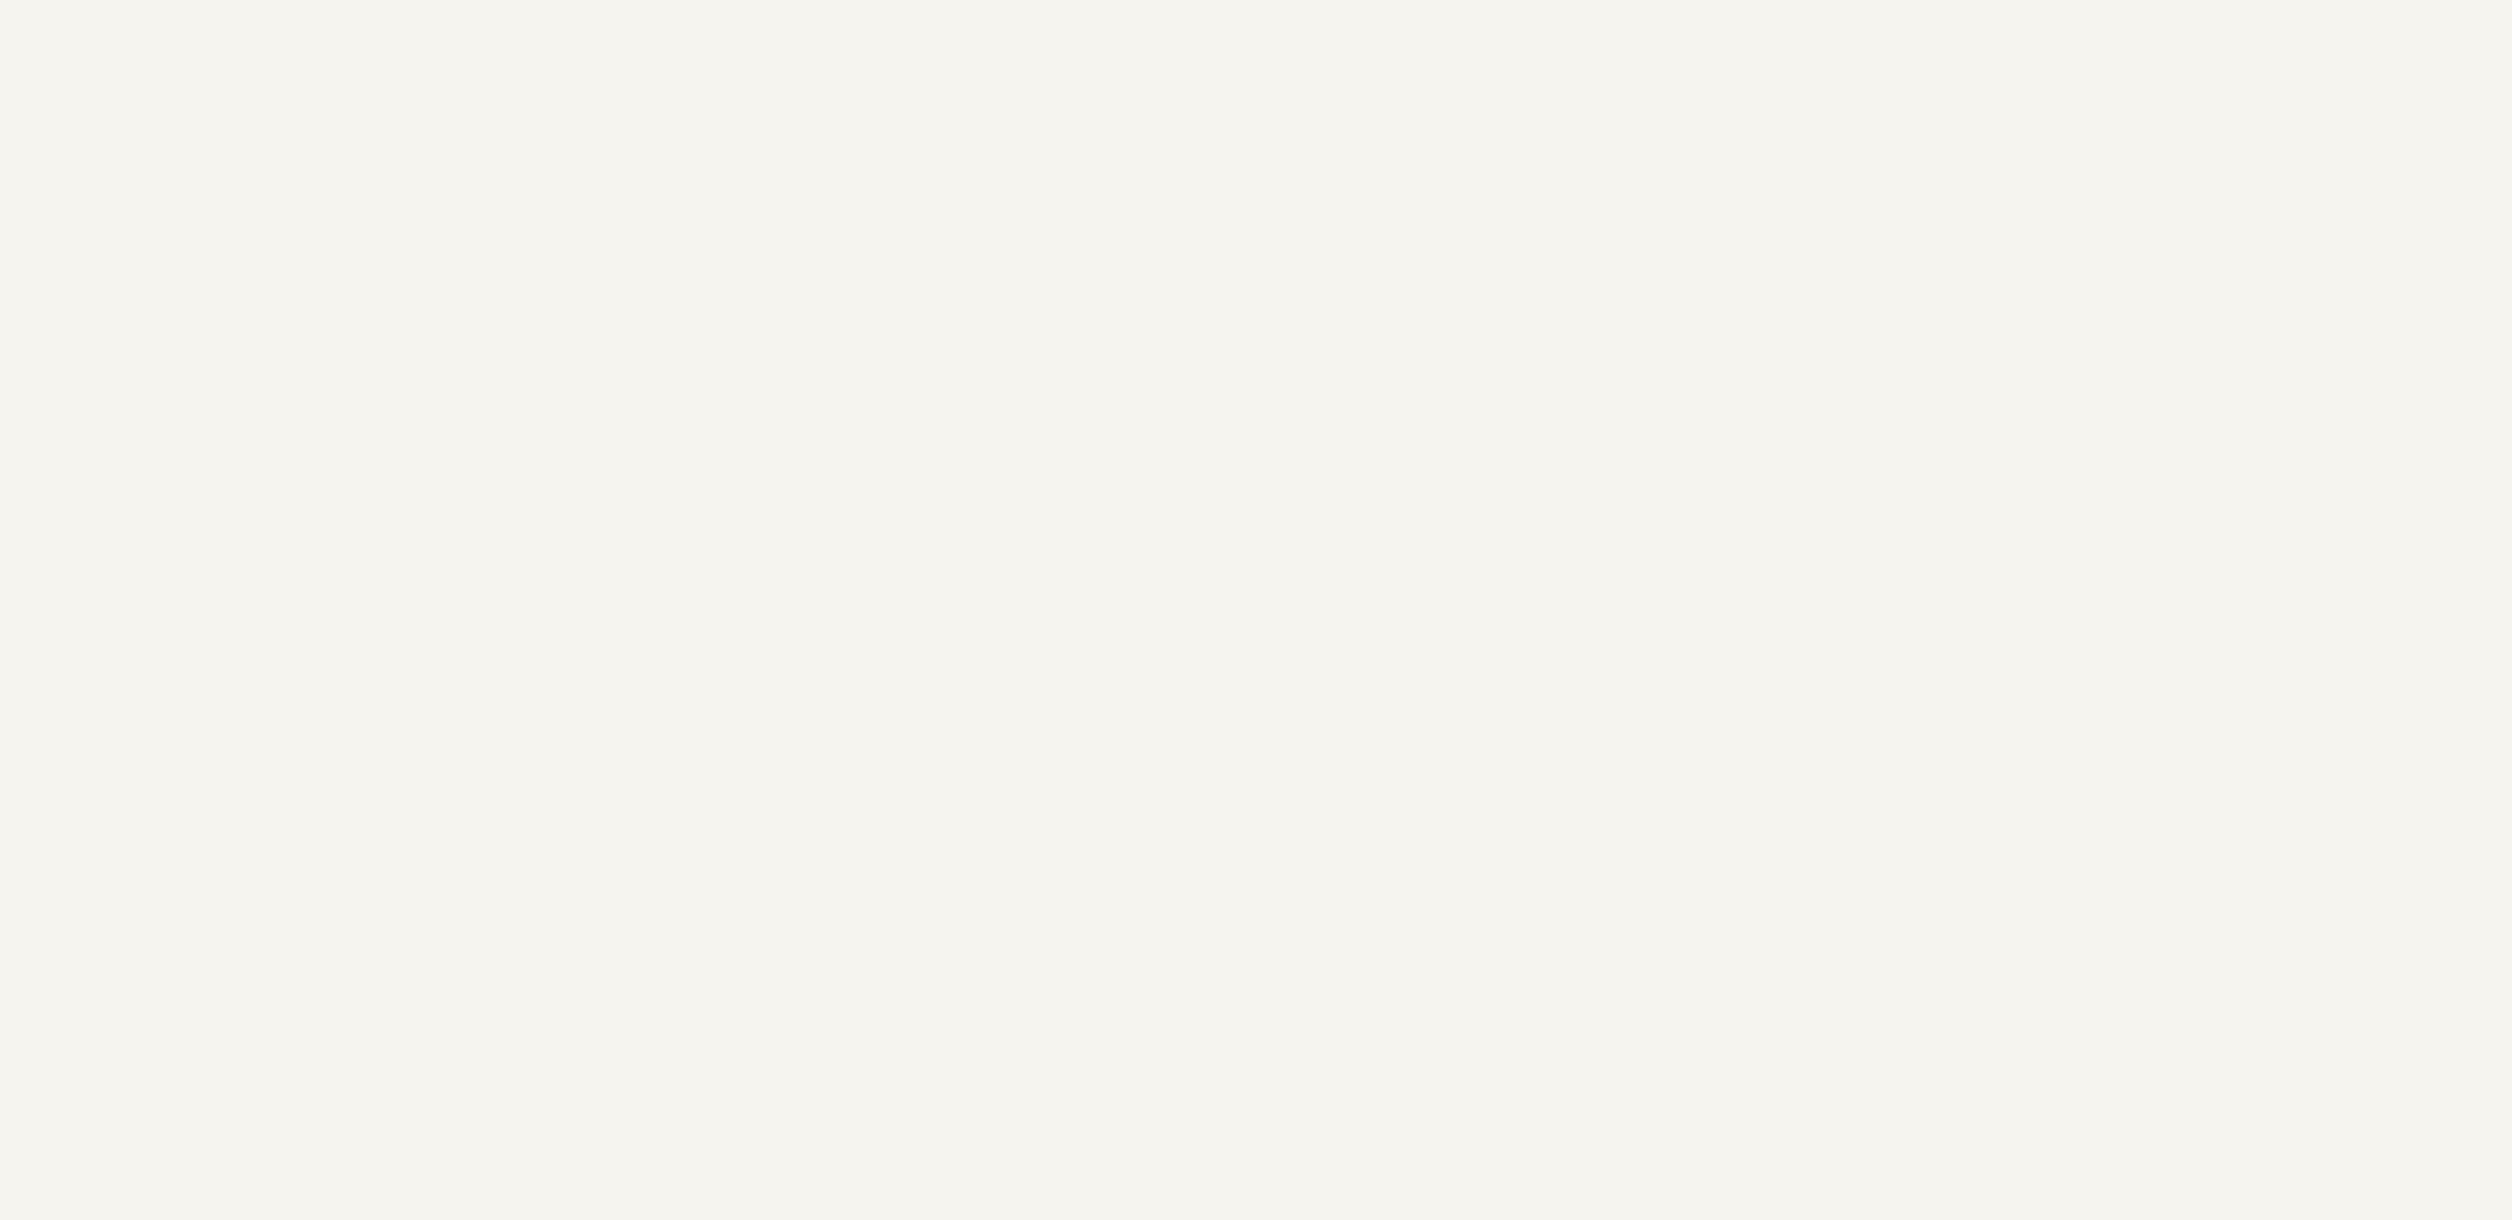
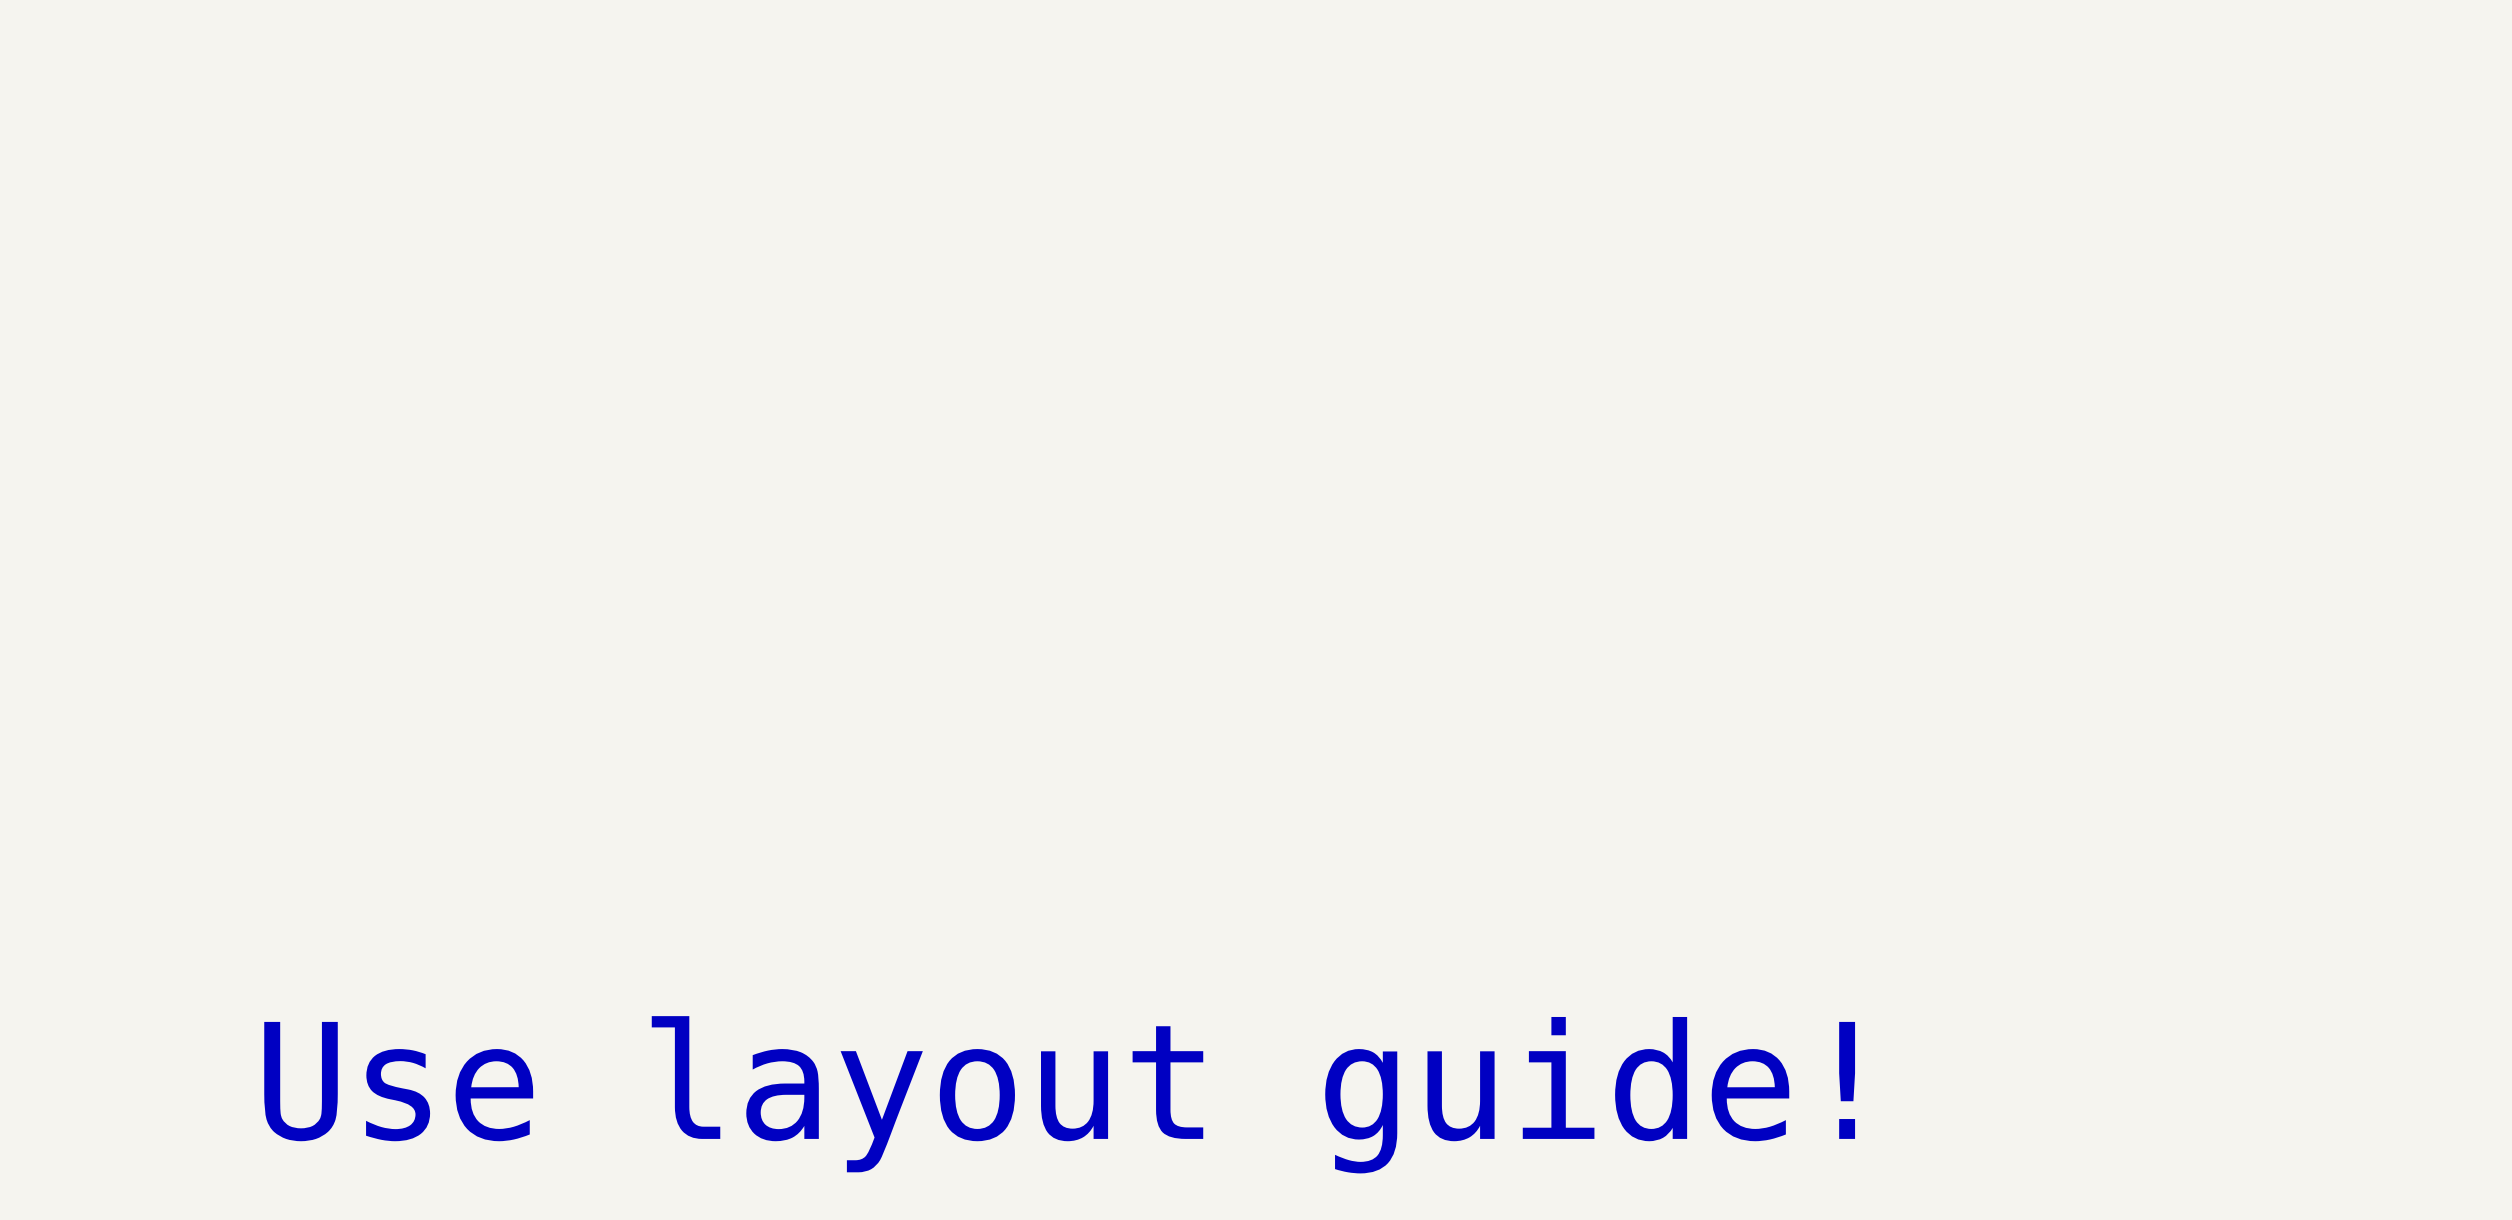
text: none -> Use layout guide! (1059, 1094)

